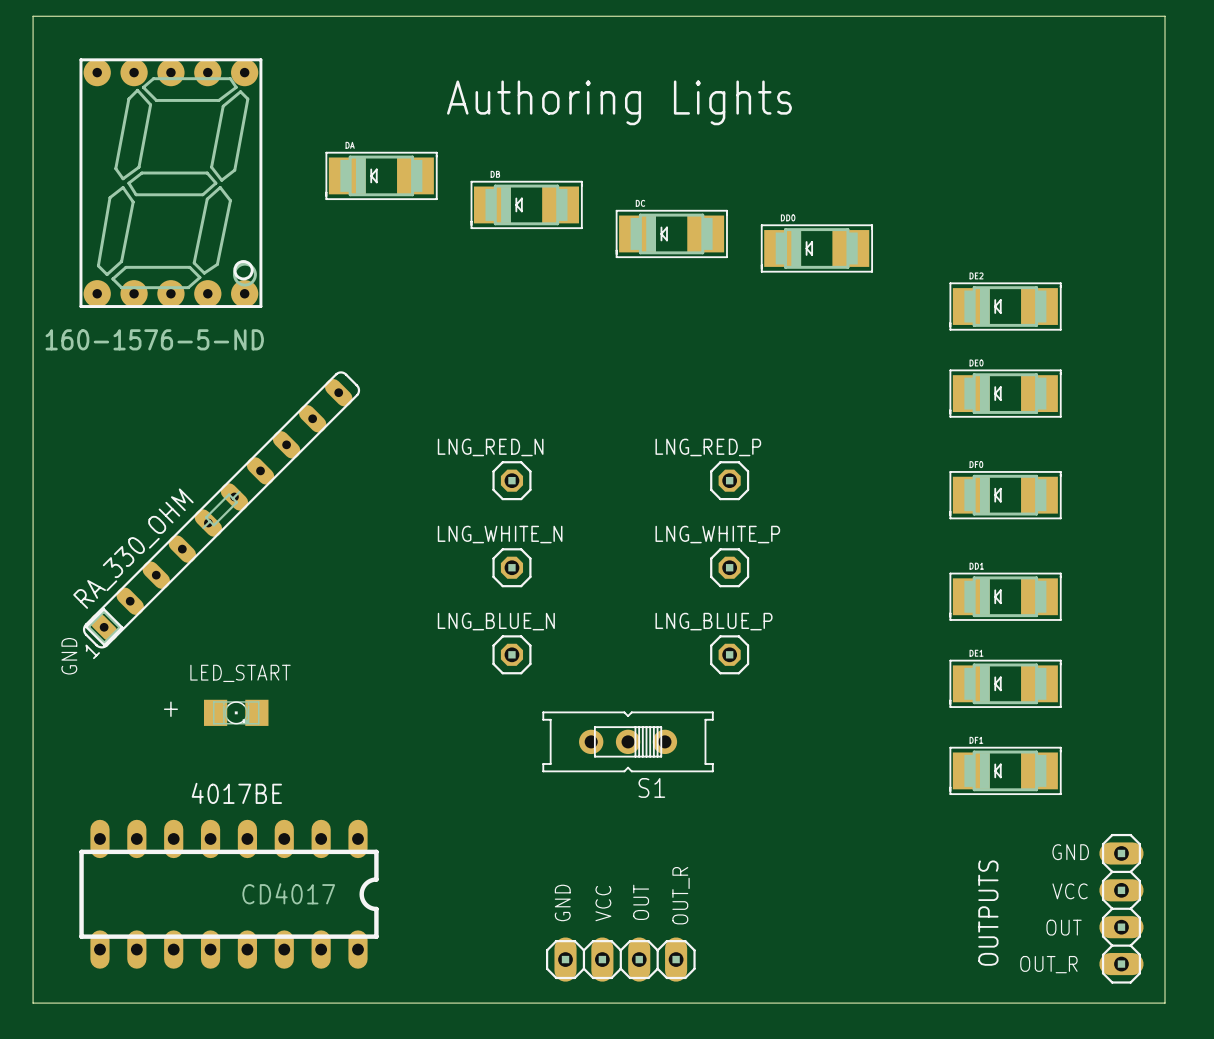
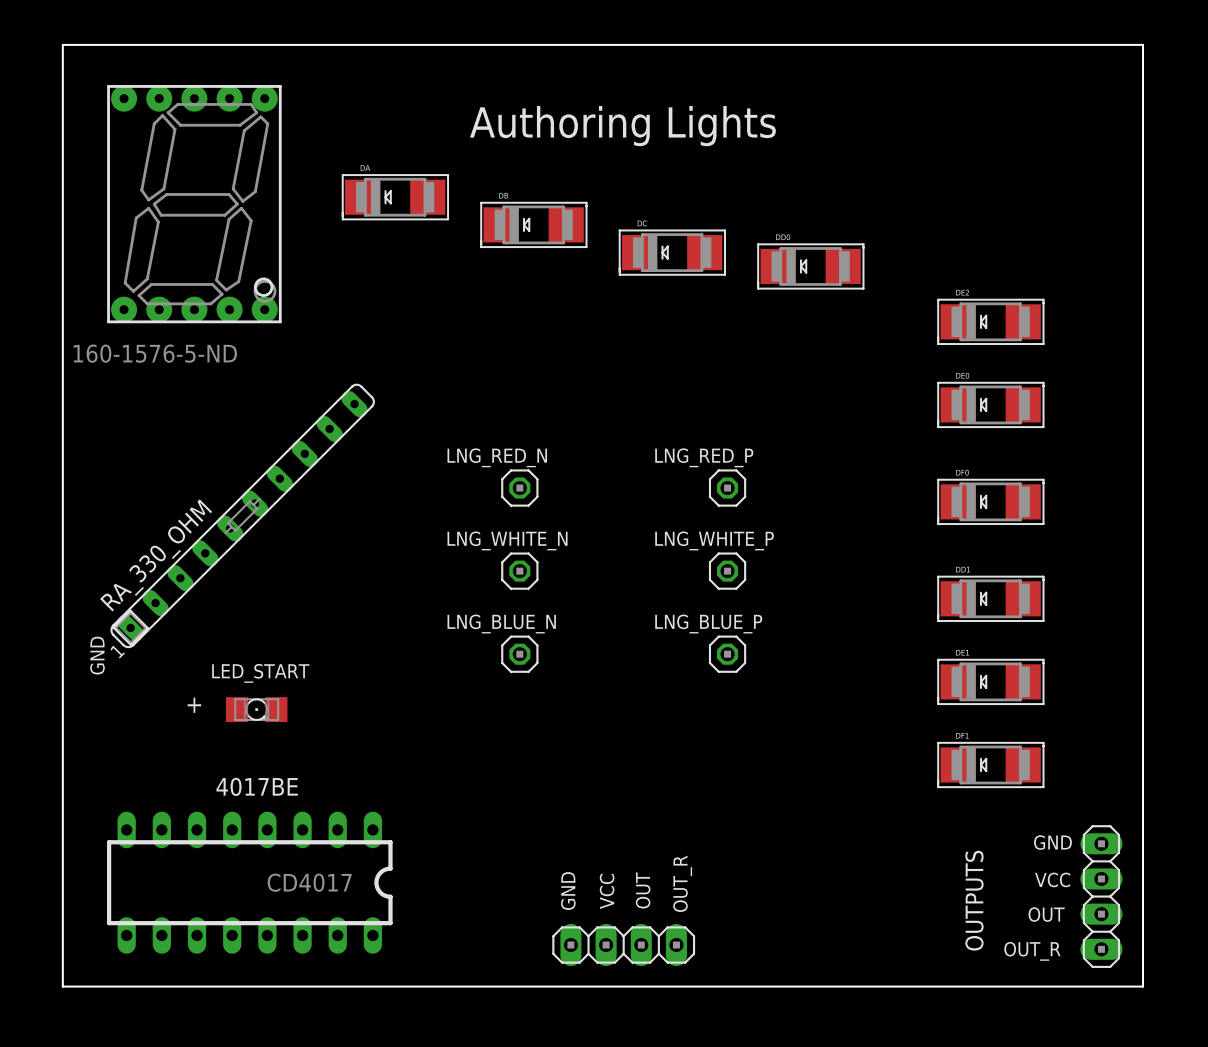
S1: (628, 741) -> none

